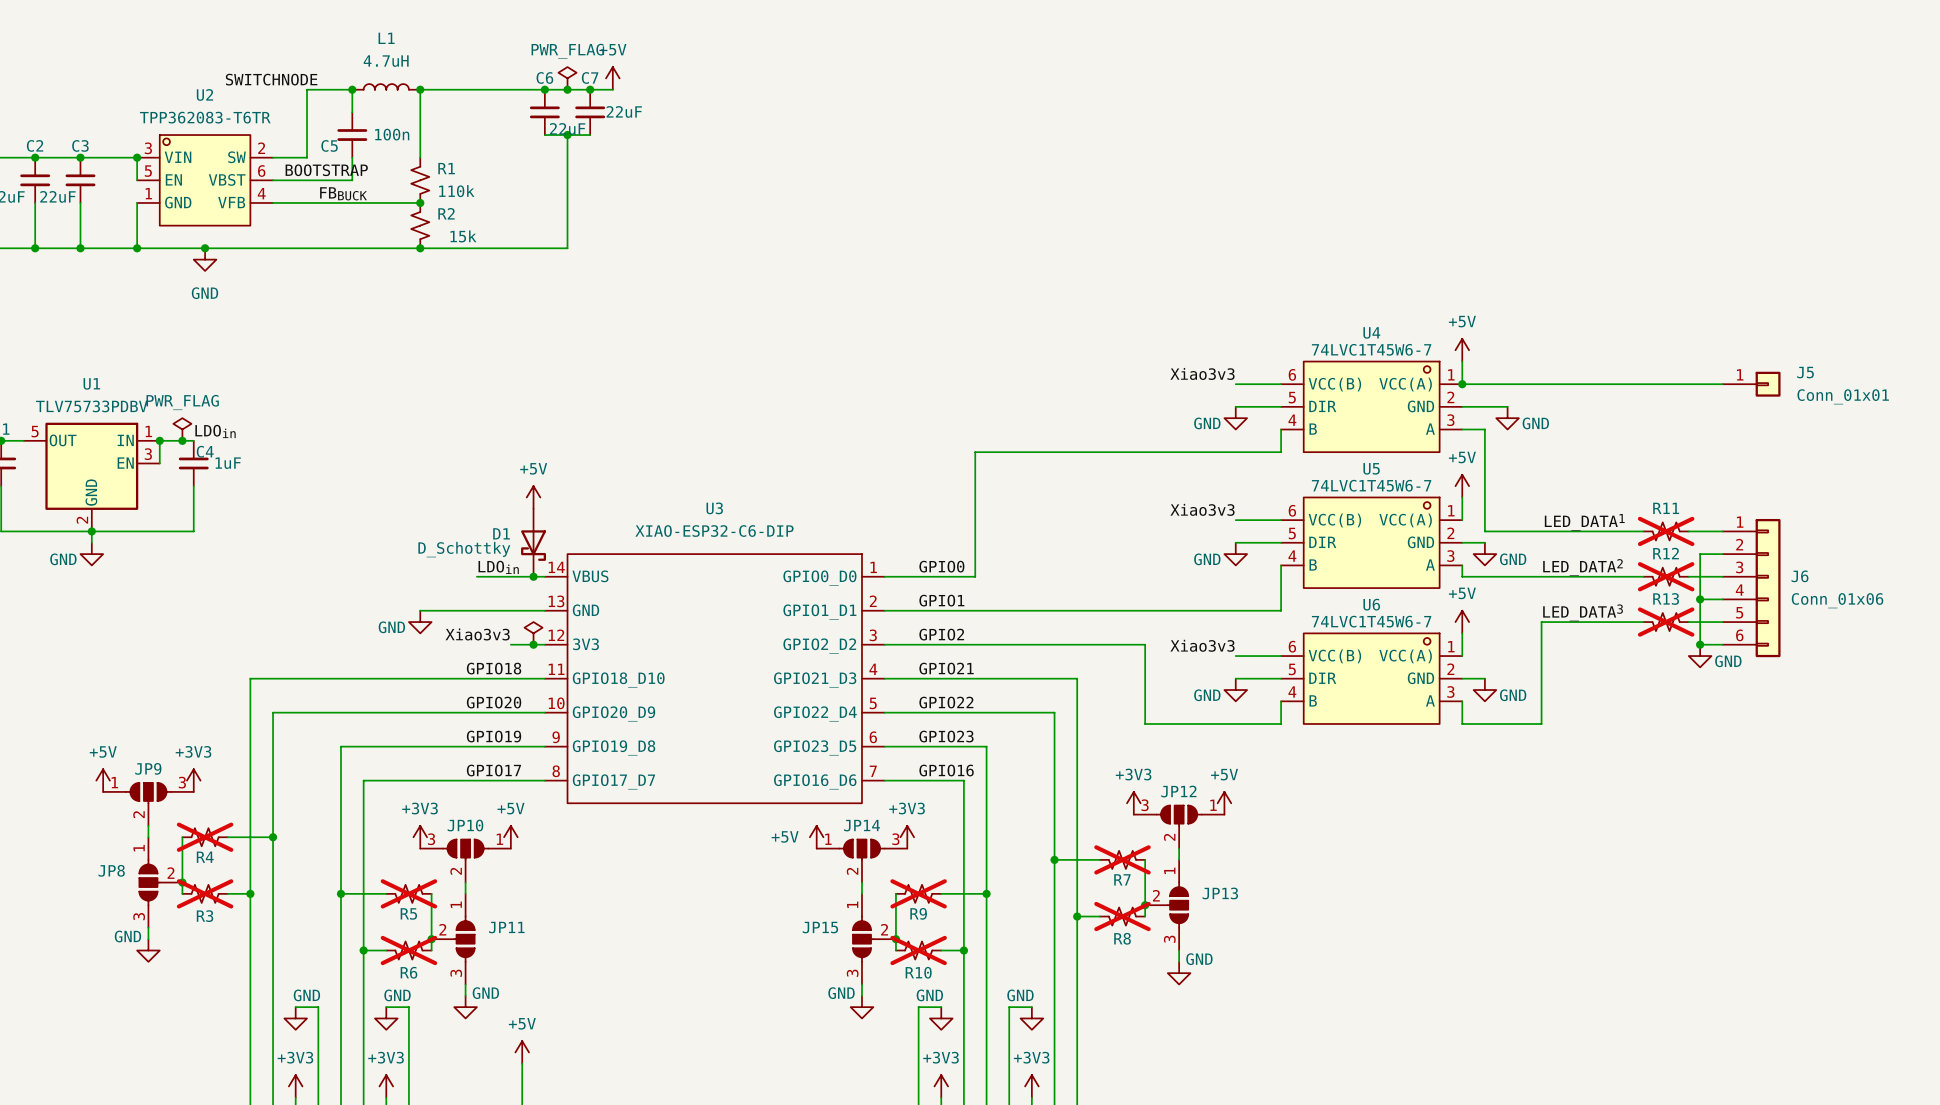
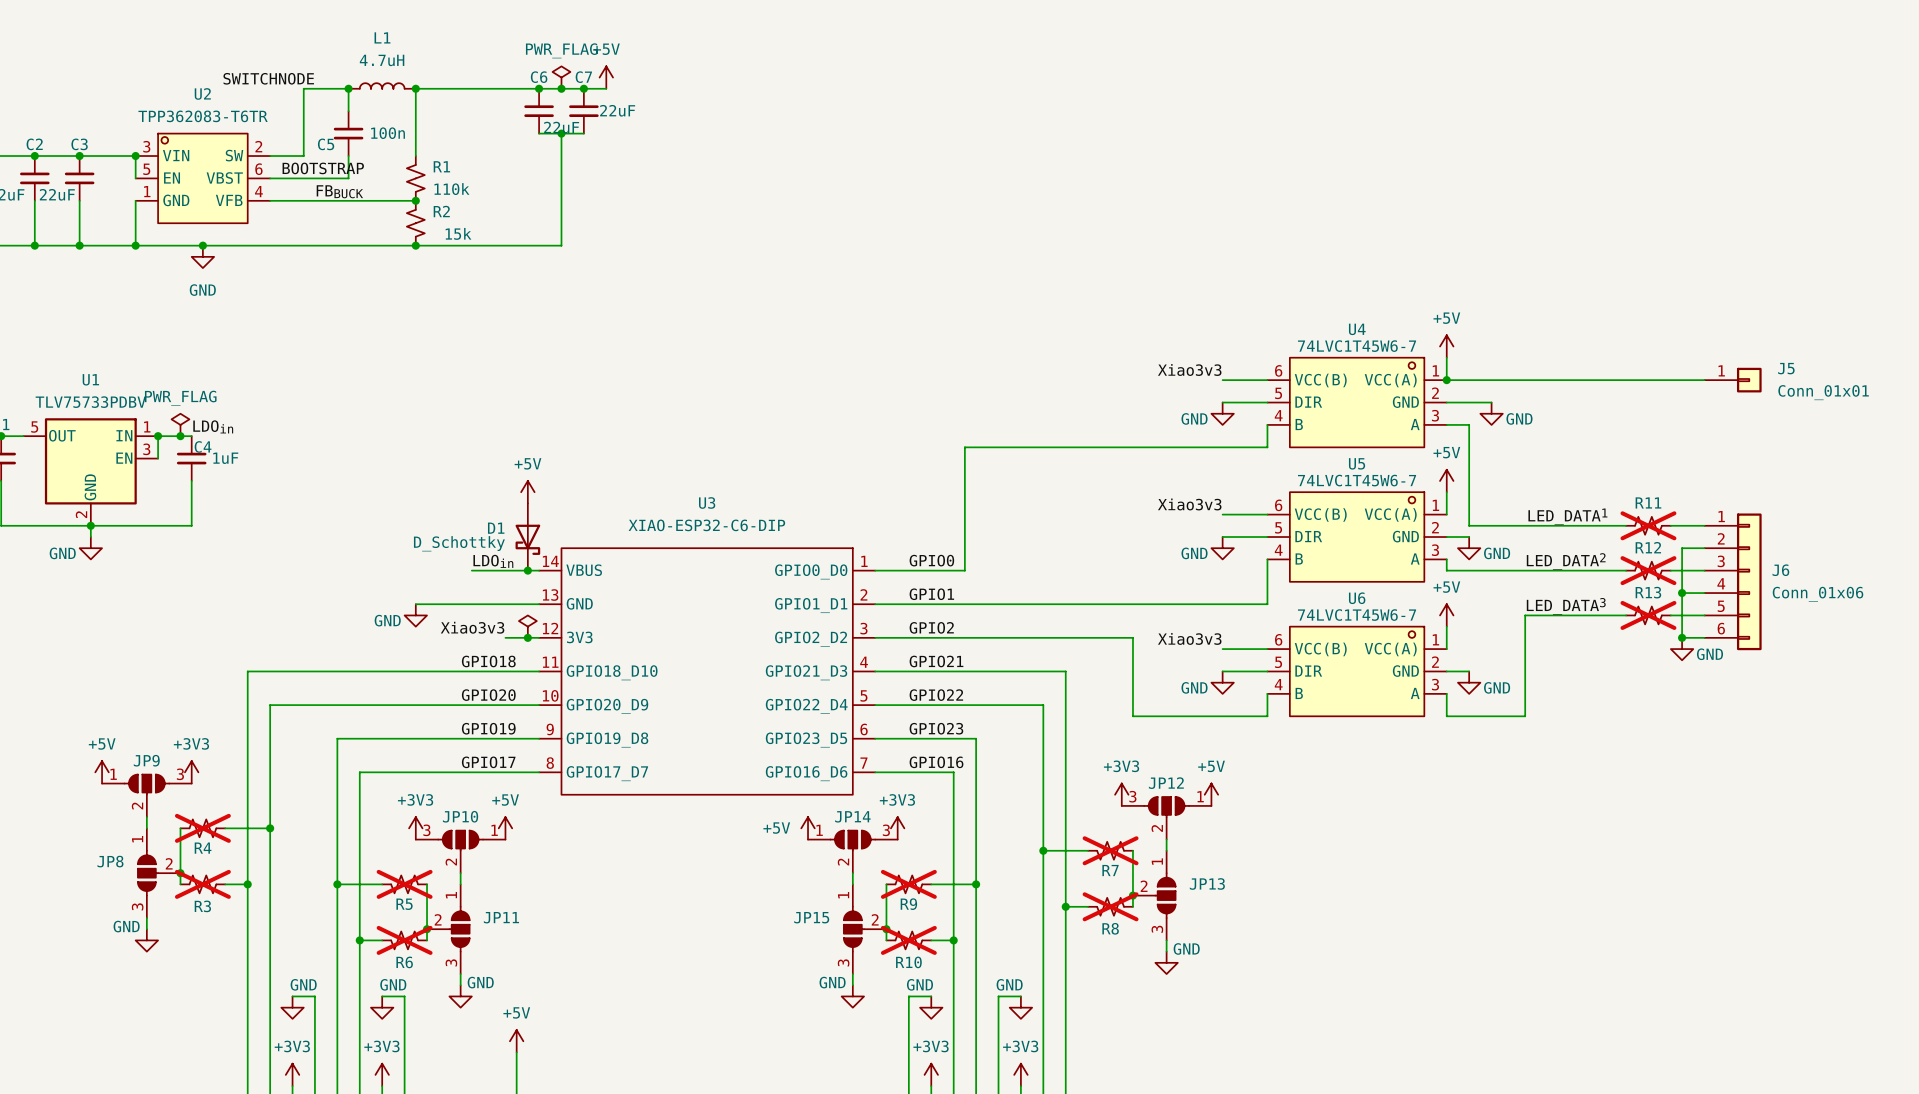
R11 flip: as is (1666, 531) -> left-right (1648, 525)
R12 flip: as is (1666, 576) -> left-right (1648, 570)
R13 flip: as is (1666, 622) -> left-right (1648, 615)

